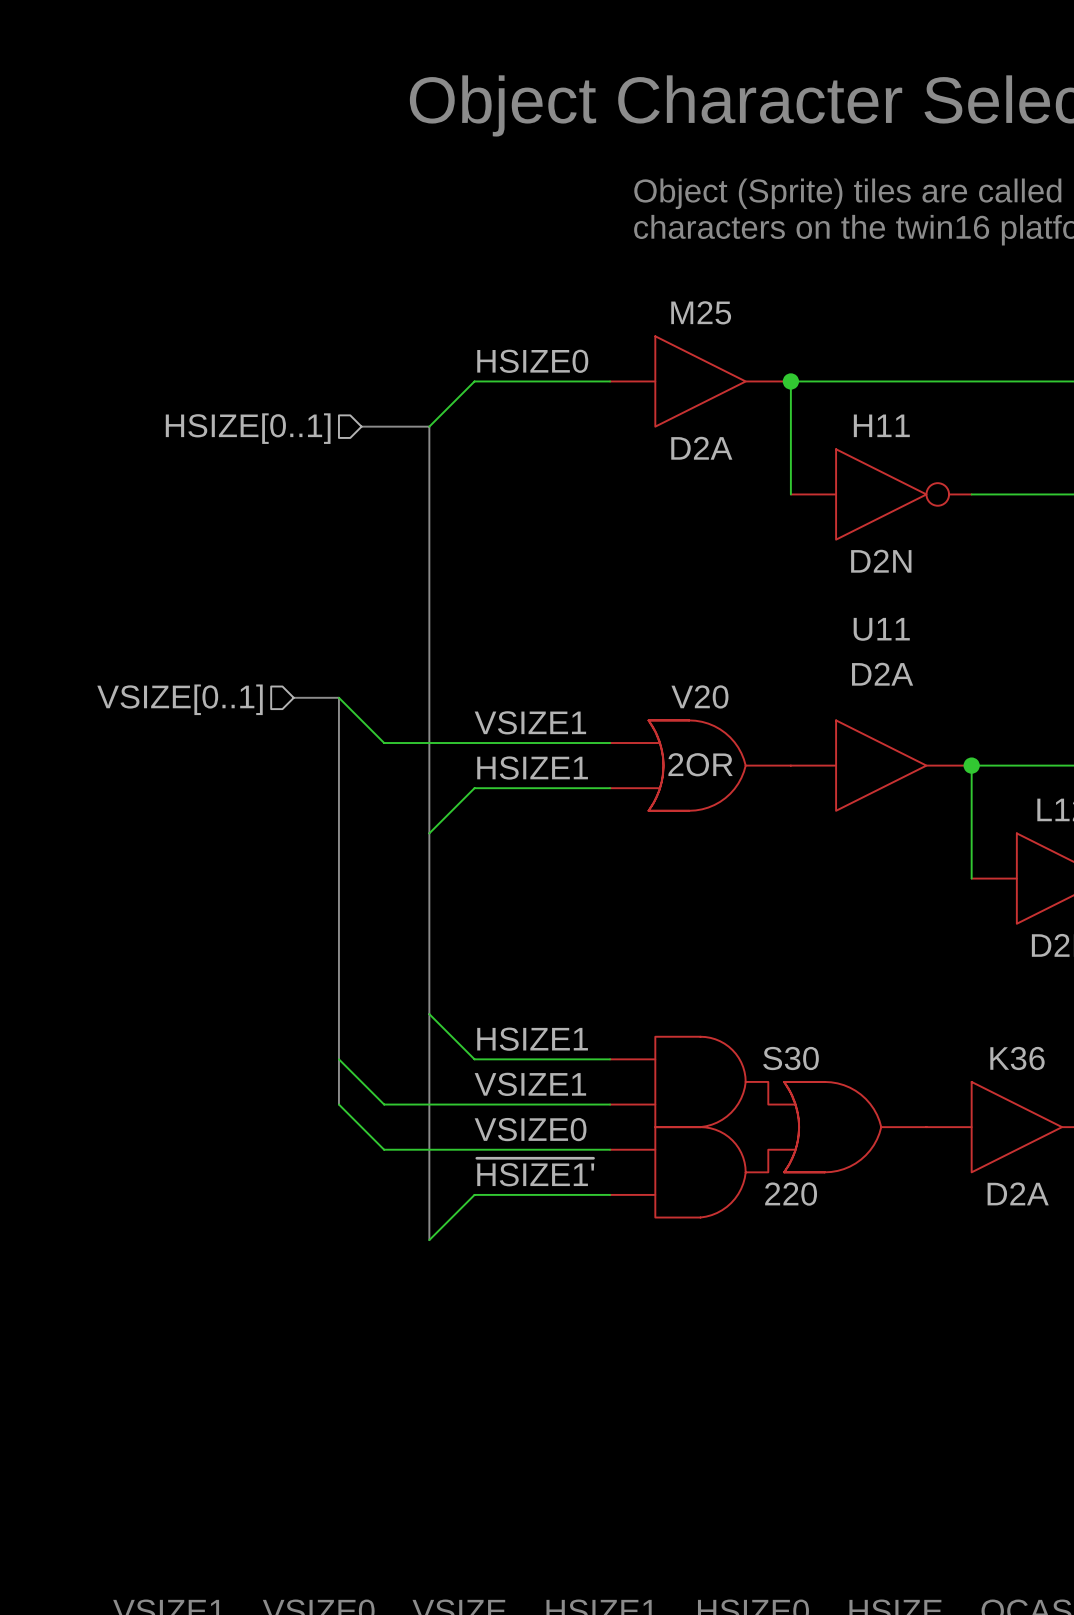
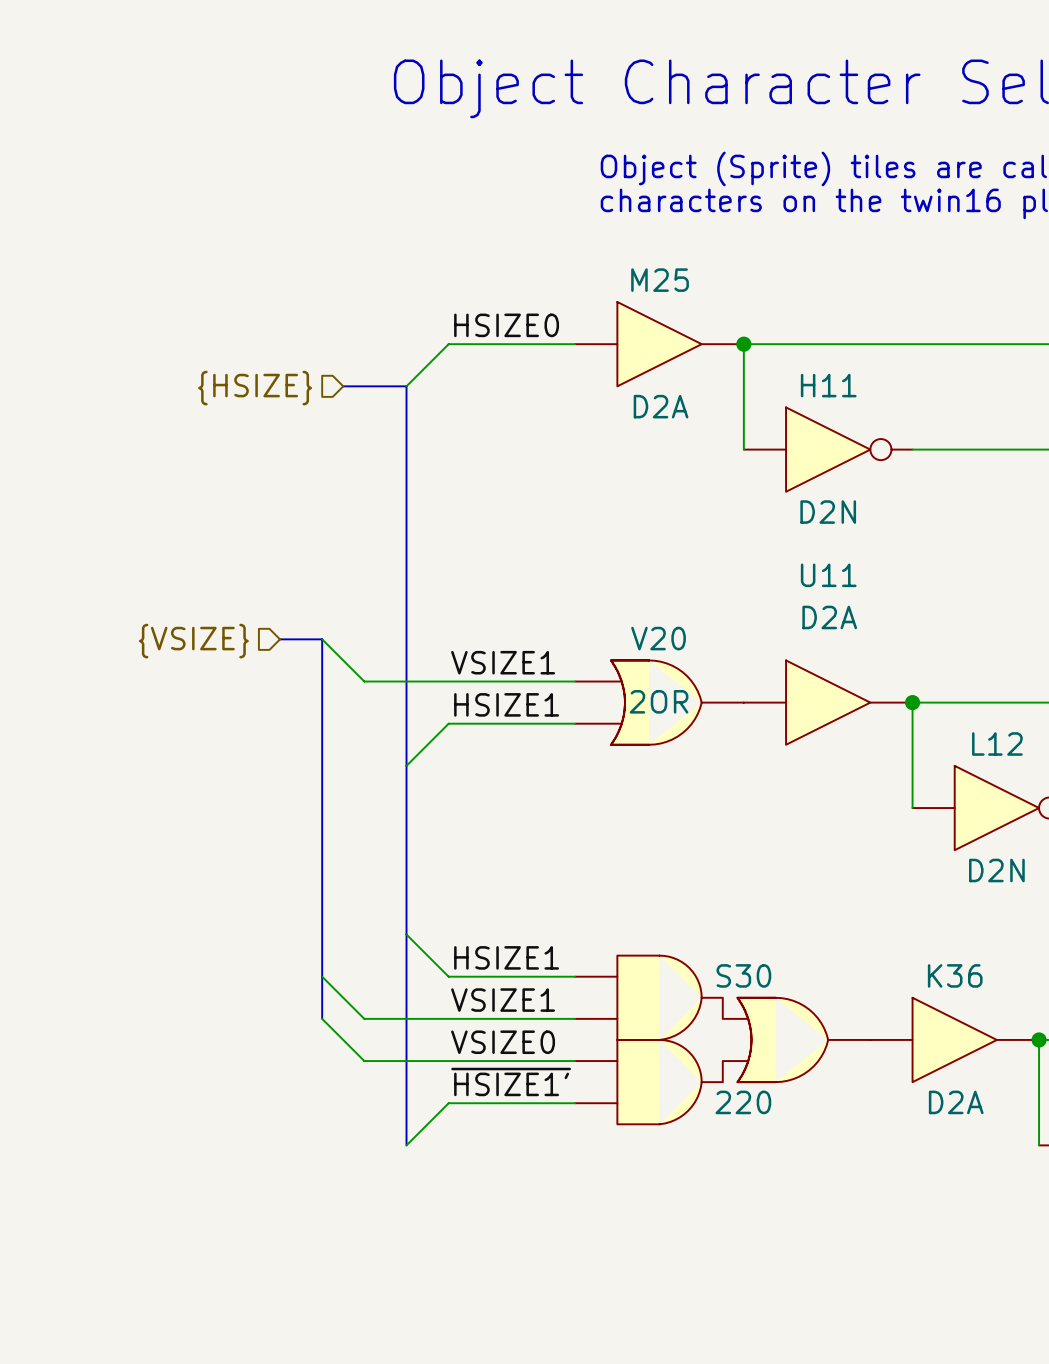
hierarchical label: HSIZE[0..1] (248, 428) -> {HSIZE} (255, 388)
hierarchical label: VSIZE[0..1] (180, 699) -> {VSIZE} (193, 641)

